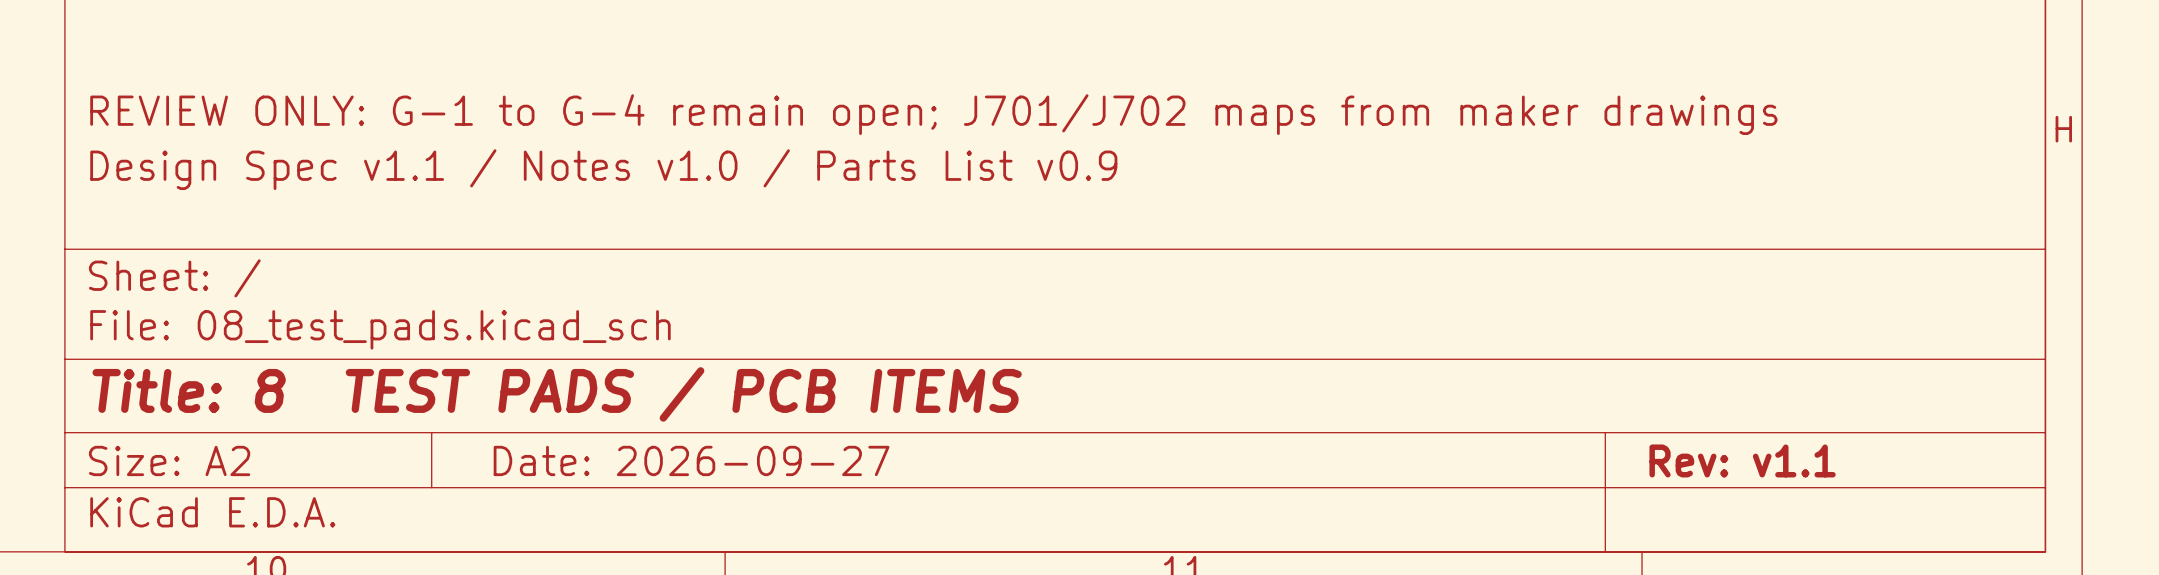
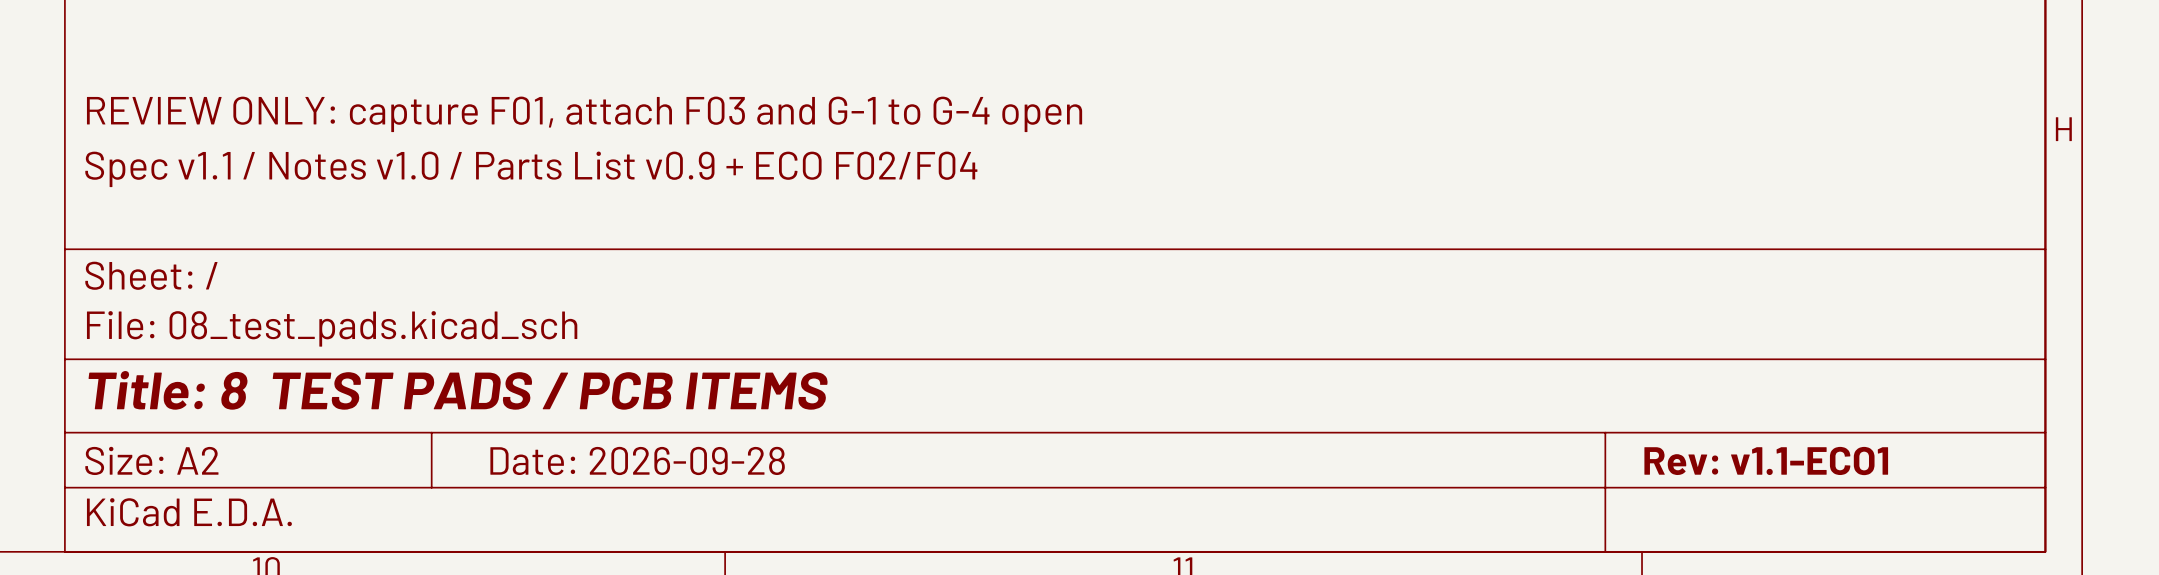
title block: REVIEW ONLY: G-1 to G-4 remain open; J701/J702 maps from maker drawings (933, 114) -> REVIEW ONLY: capture F01, attach F03 and G-1 to G-4 open (584, 114)
title block: Design Spec v1.1 / Notes v1.0 / Parts List v0.9 (603, 169) -> Spec v1.1 / Notes v1.0 / Parts List v0.9 + ECO F02/F04 (531, 169)
title block: Date: 2026-09-27 (691, 460) -> Date: 2026-09-28 (637, 460)
title block: Rev: v1.1 (1742, 460) -> Rev: v1.1-ECO1 (1766, 461)

